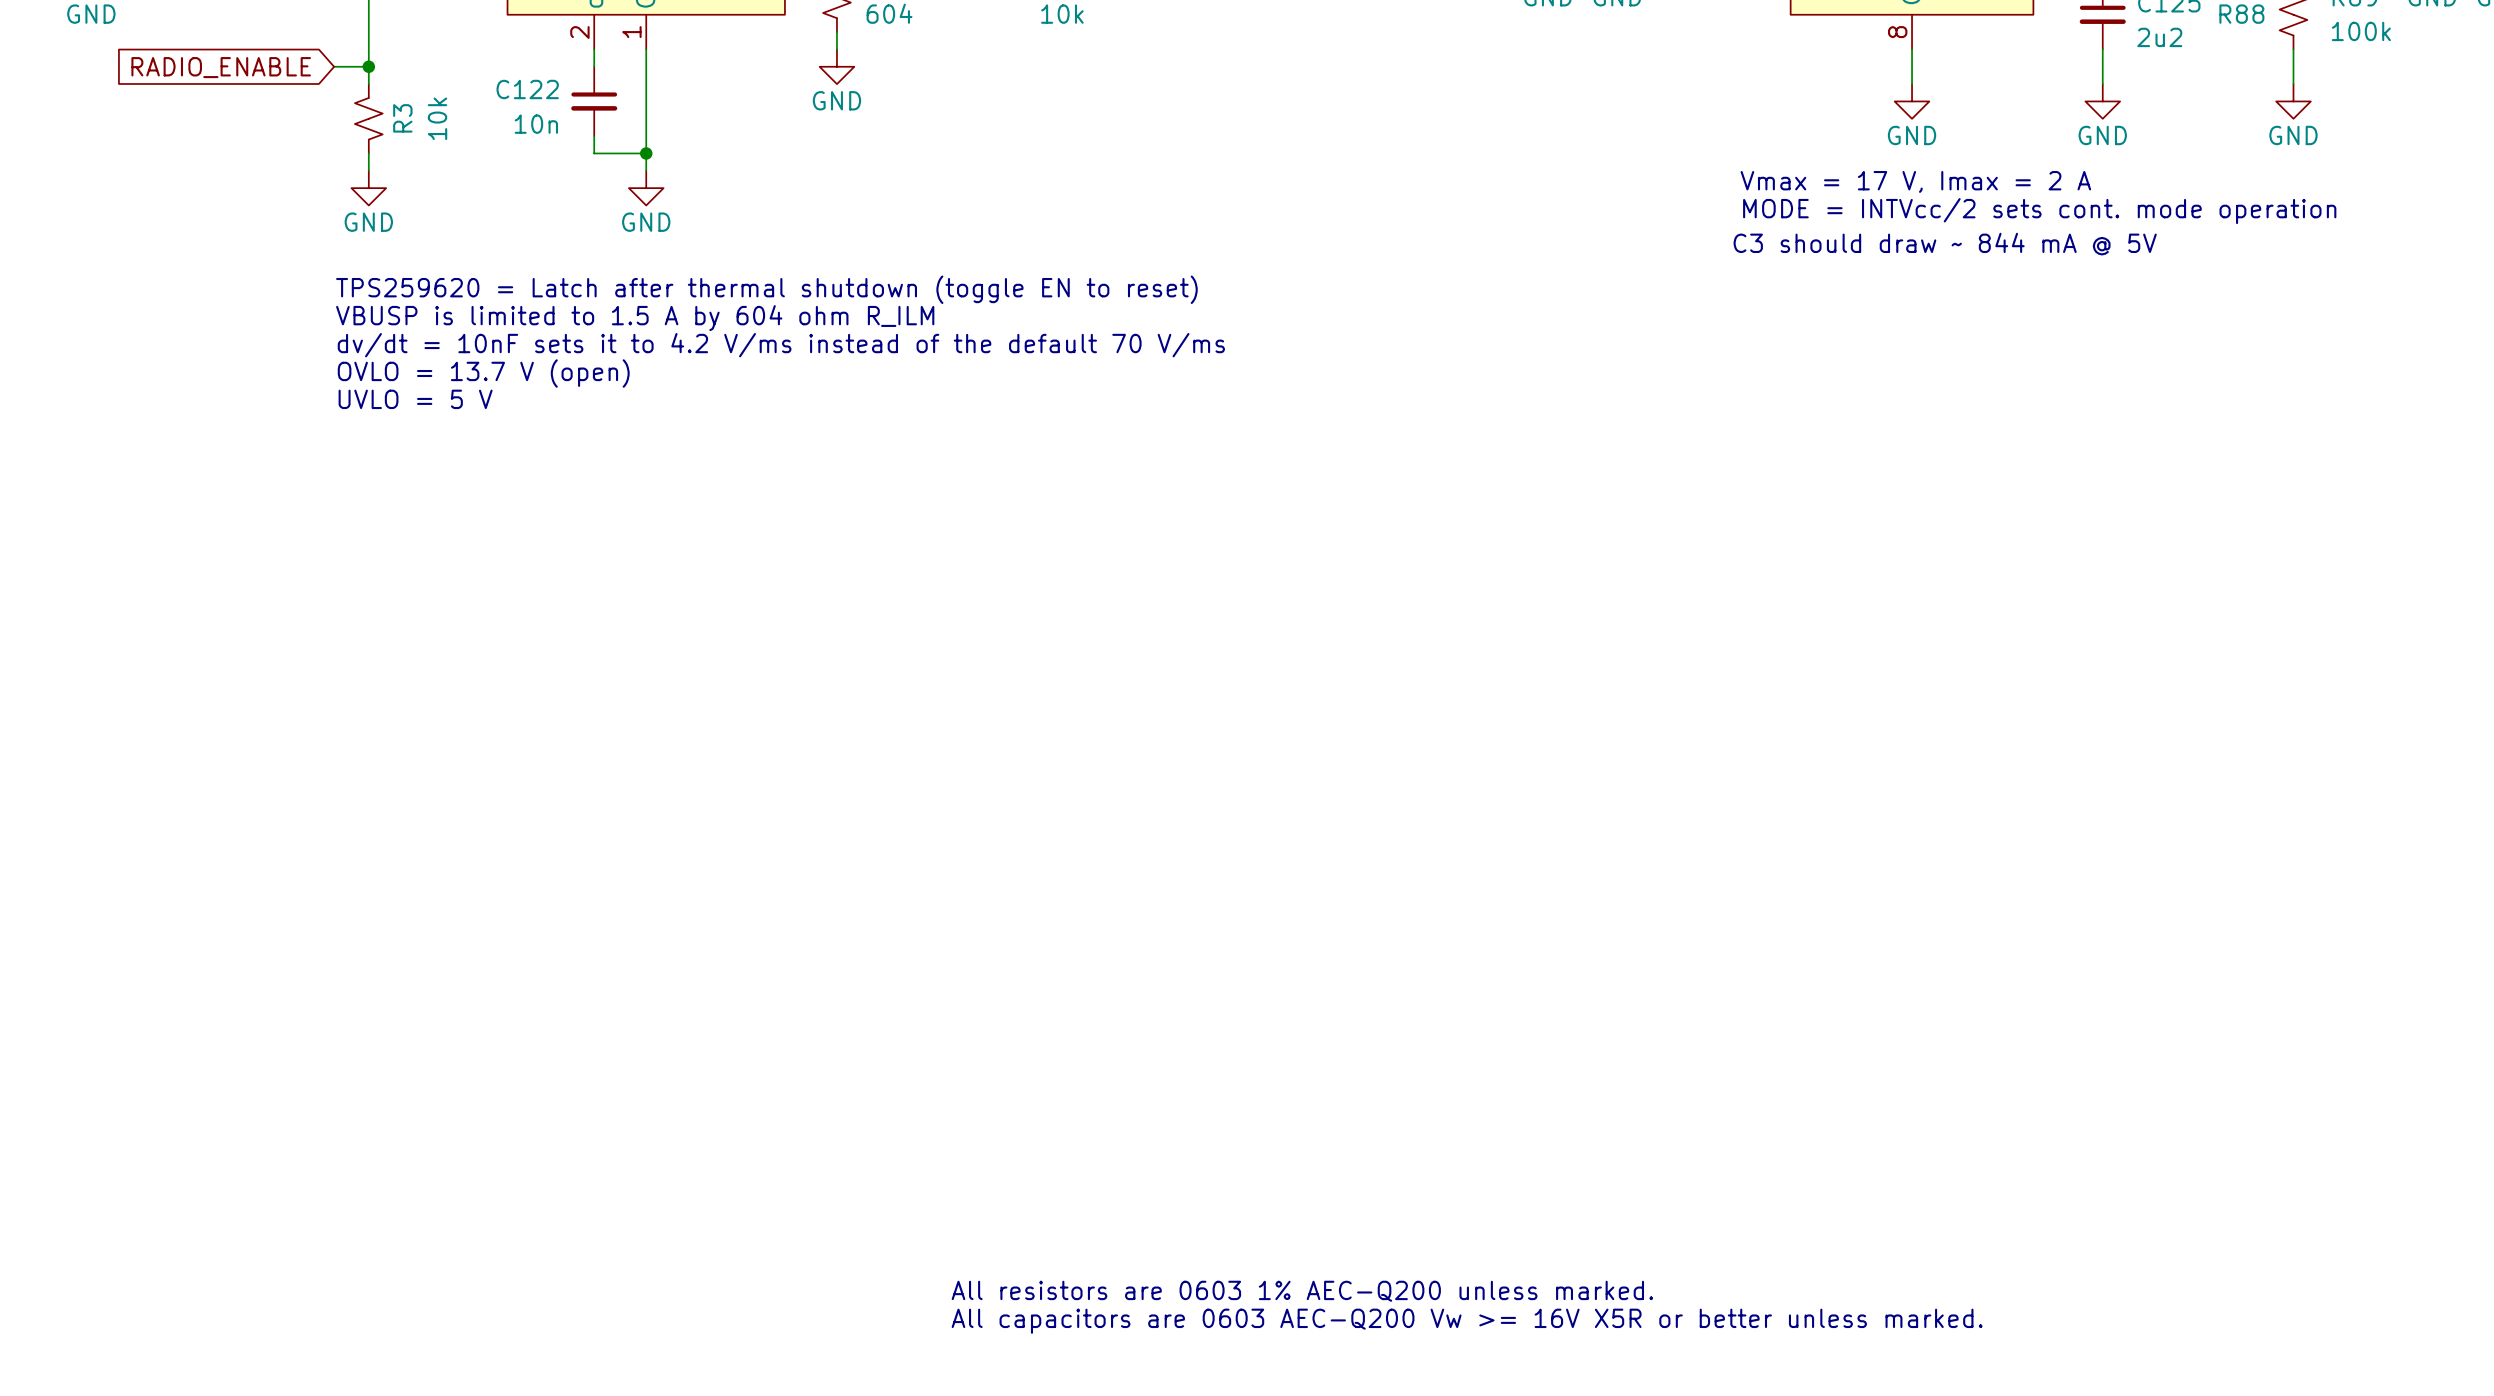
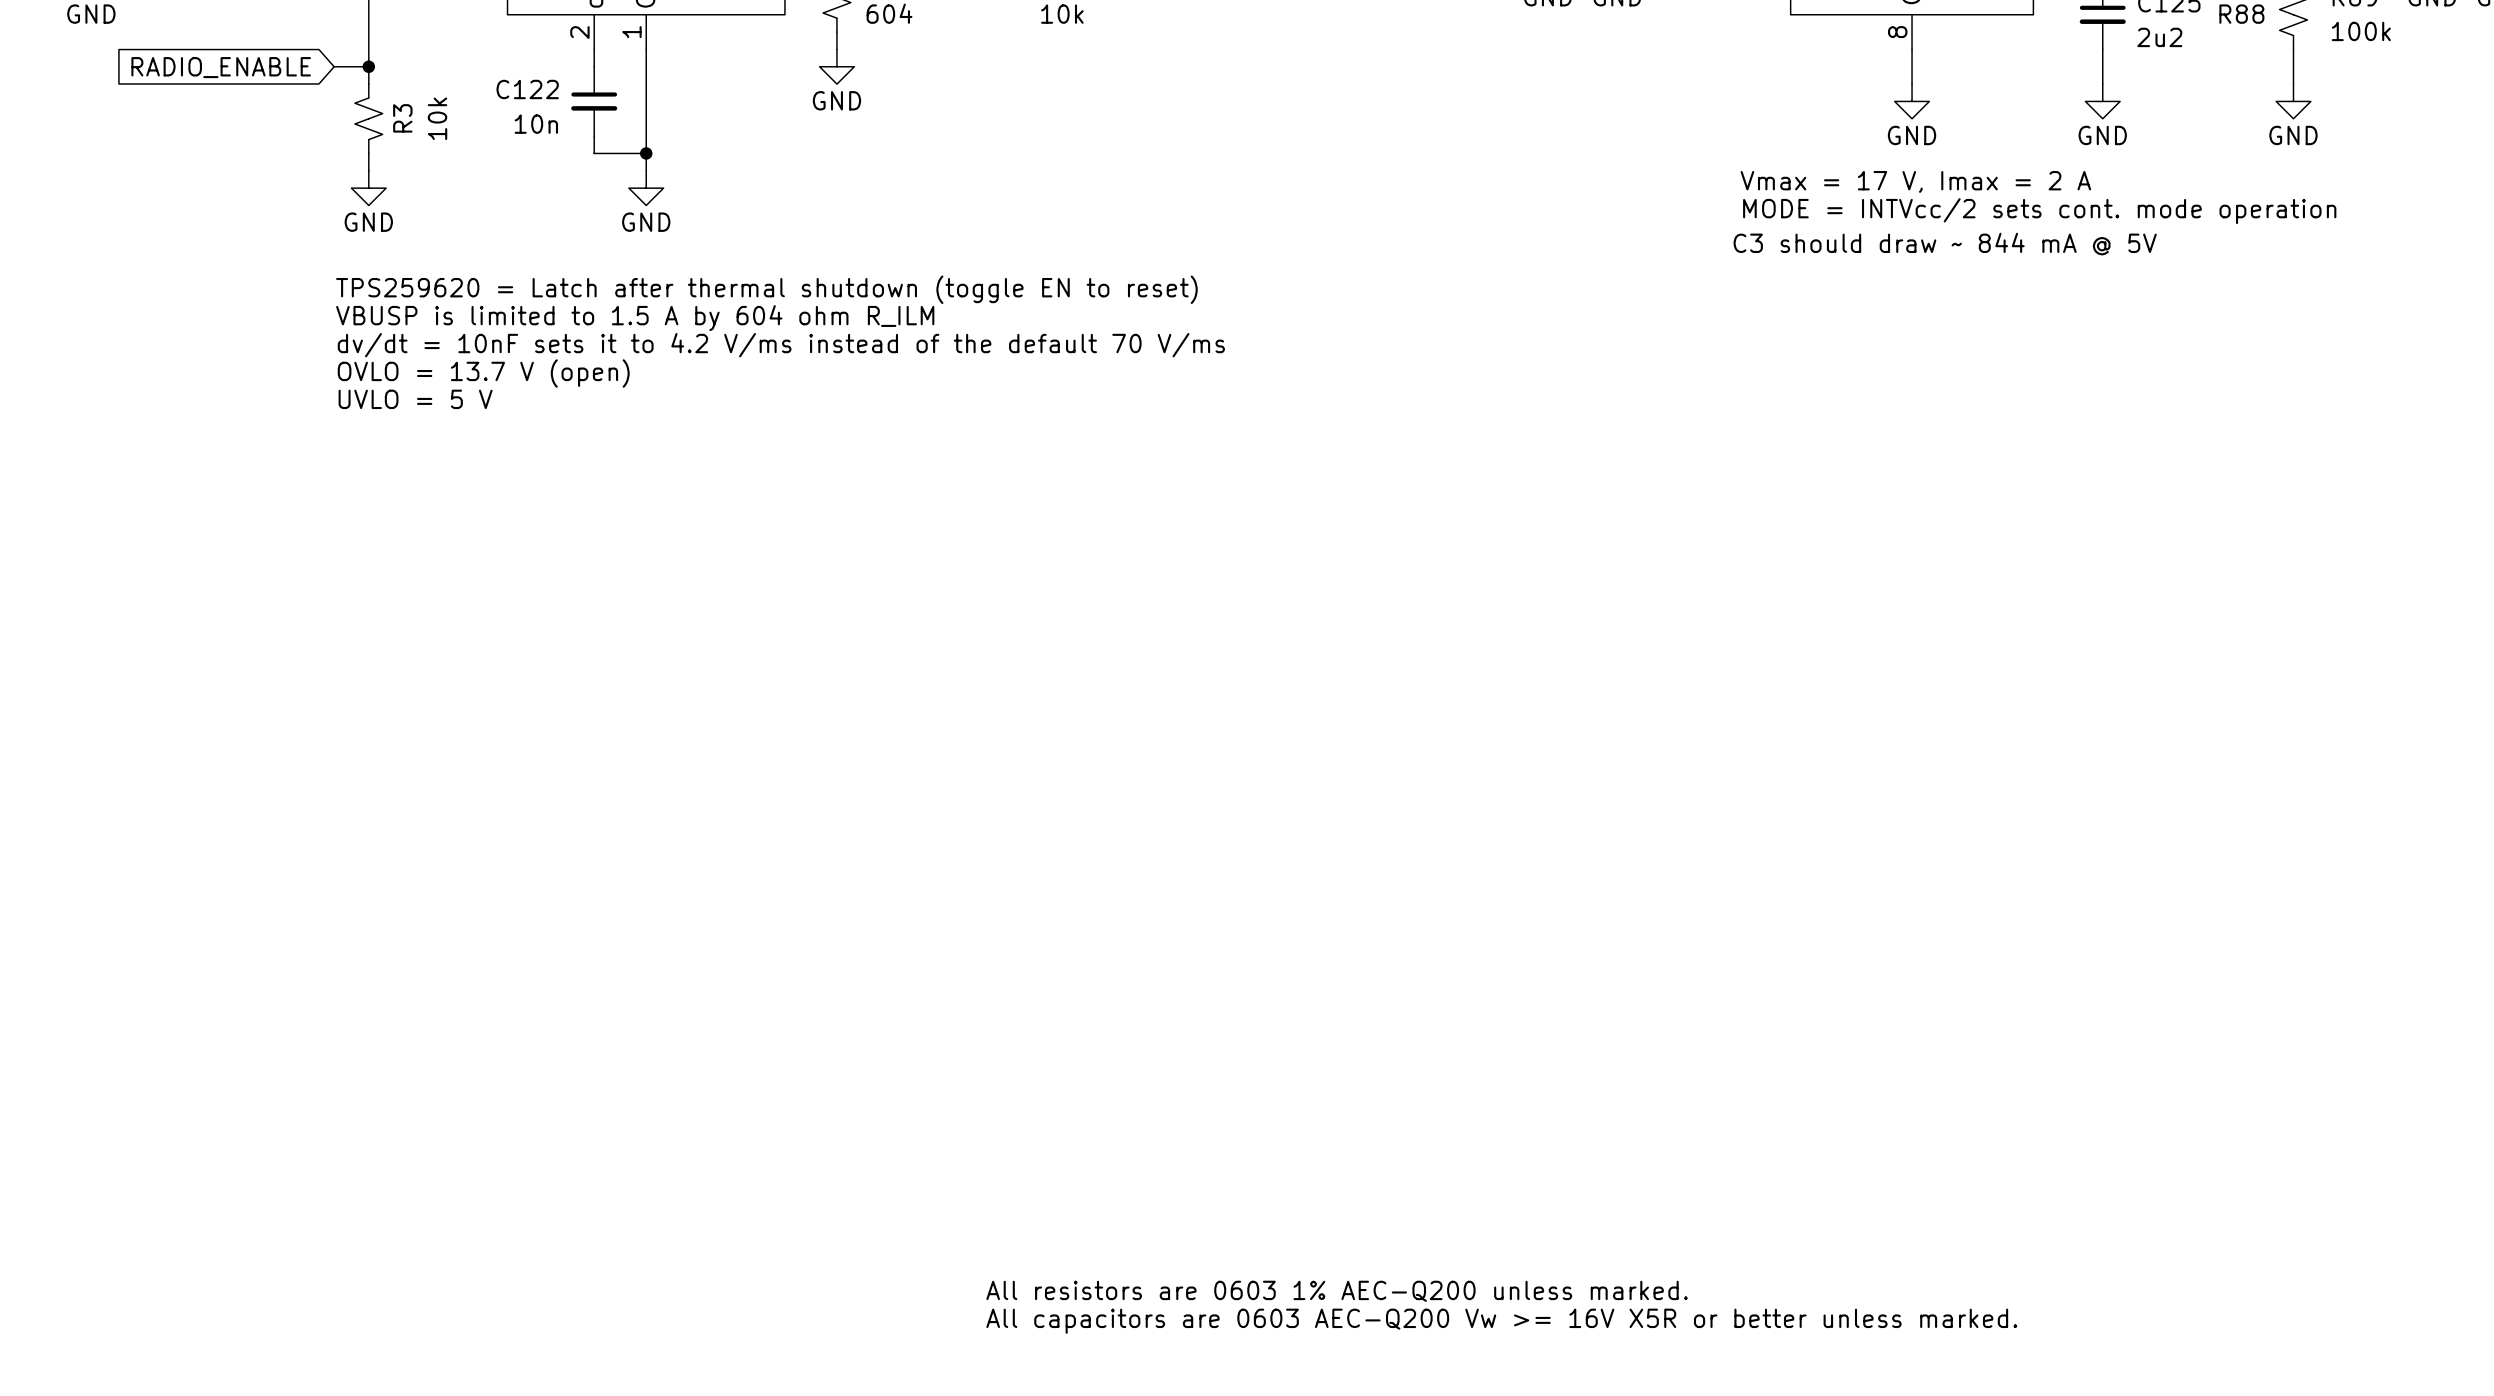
text position: All resistors are 0603 1% AEC-Q200 unless marked. (1302, 1291) -> All resistors are 0603 1% AEC-Q200 unless marked. (1337, 1291)
text position: All capacitors are 0603 AEC-Q200 Vw >= 16V X5R or better unless marked. (1467, 1321) -> All capacitors are 0603 AEC-Q200 Vw >= 16V X5R or better unless marked. (1501, 1321)

